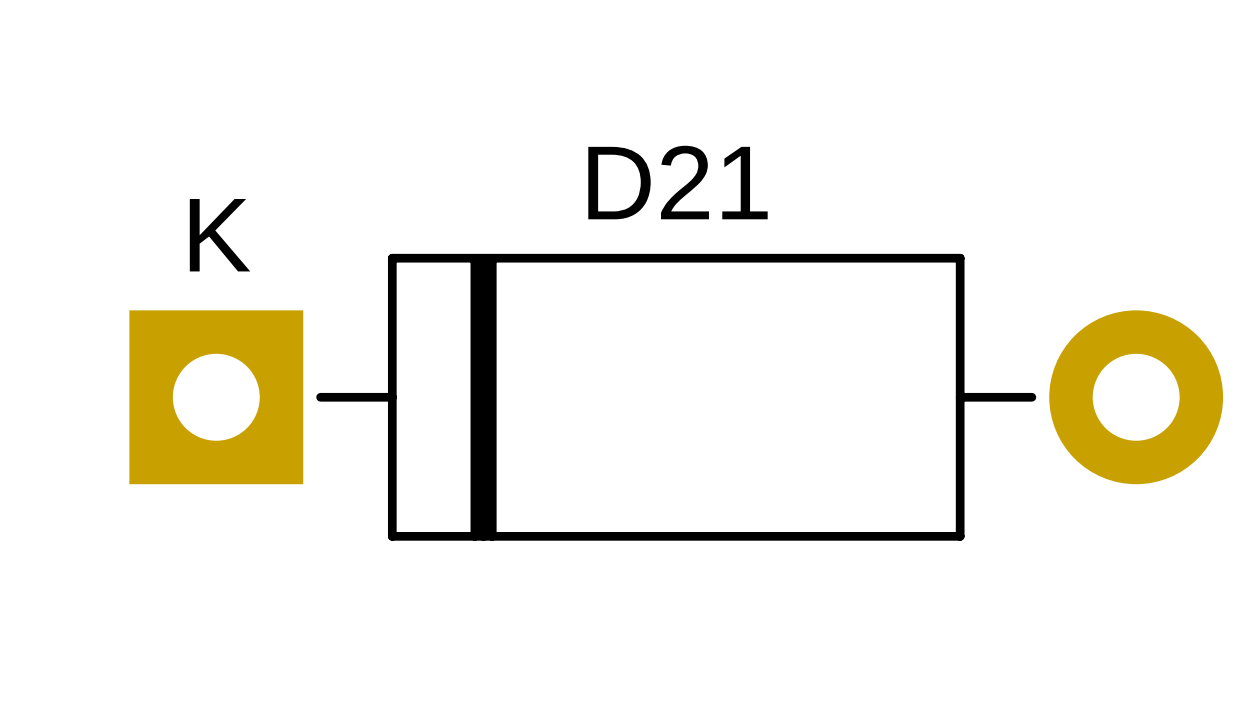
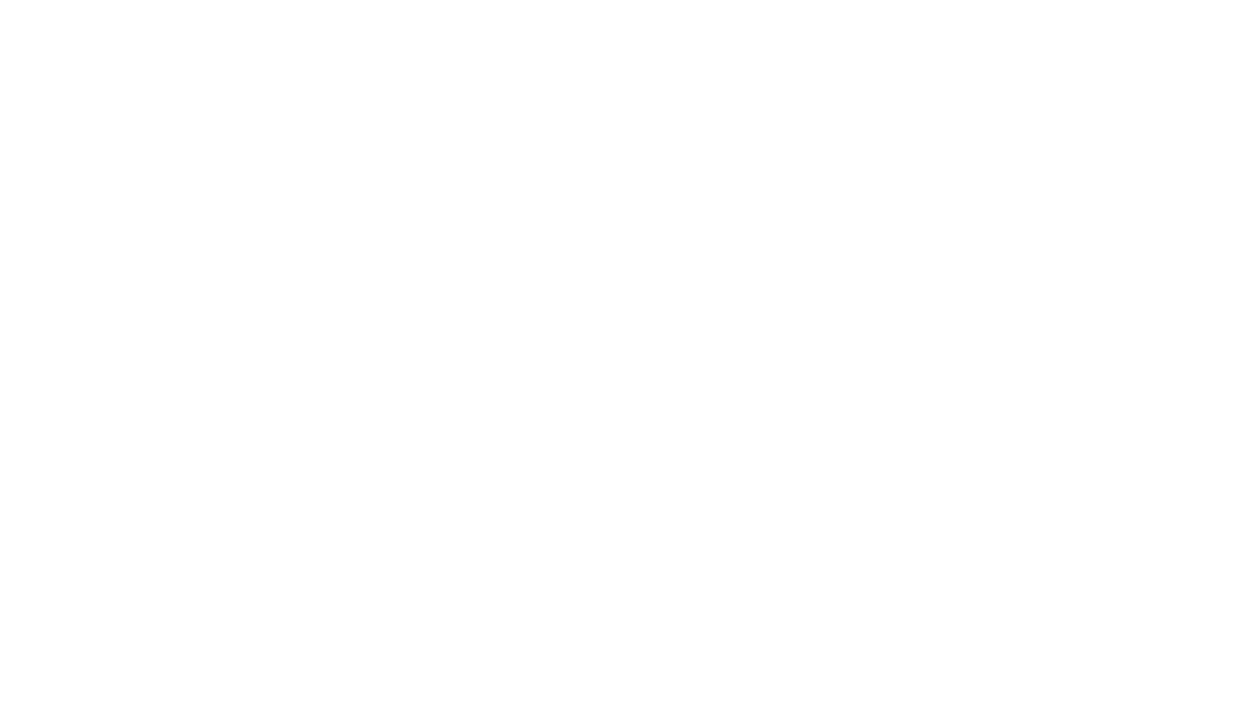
D21: (676, 397) -> none

